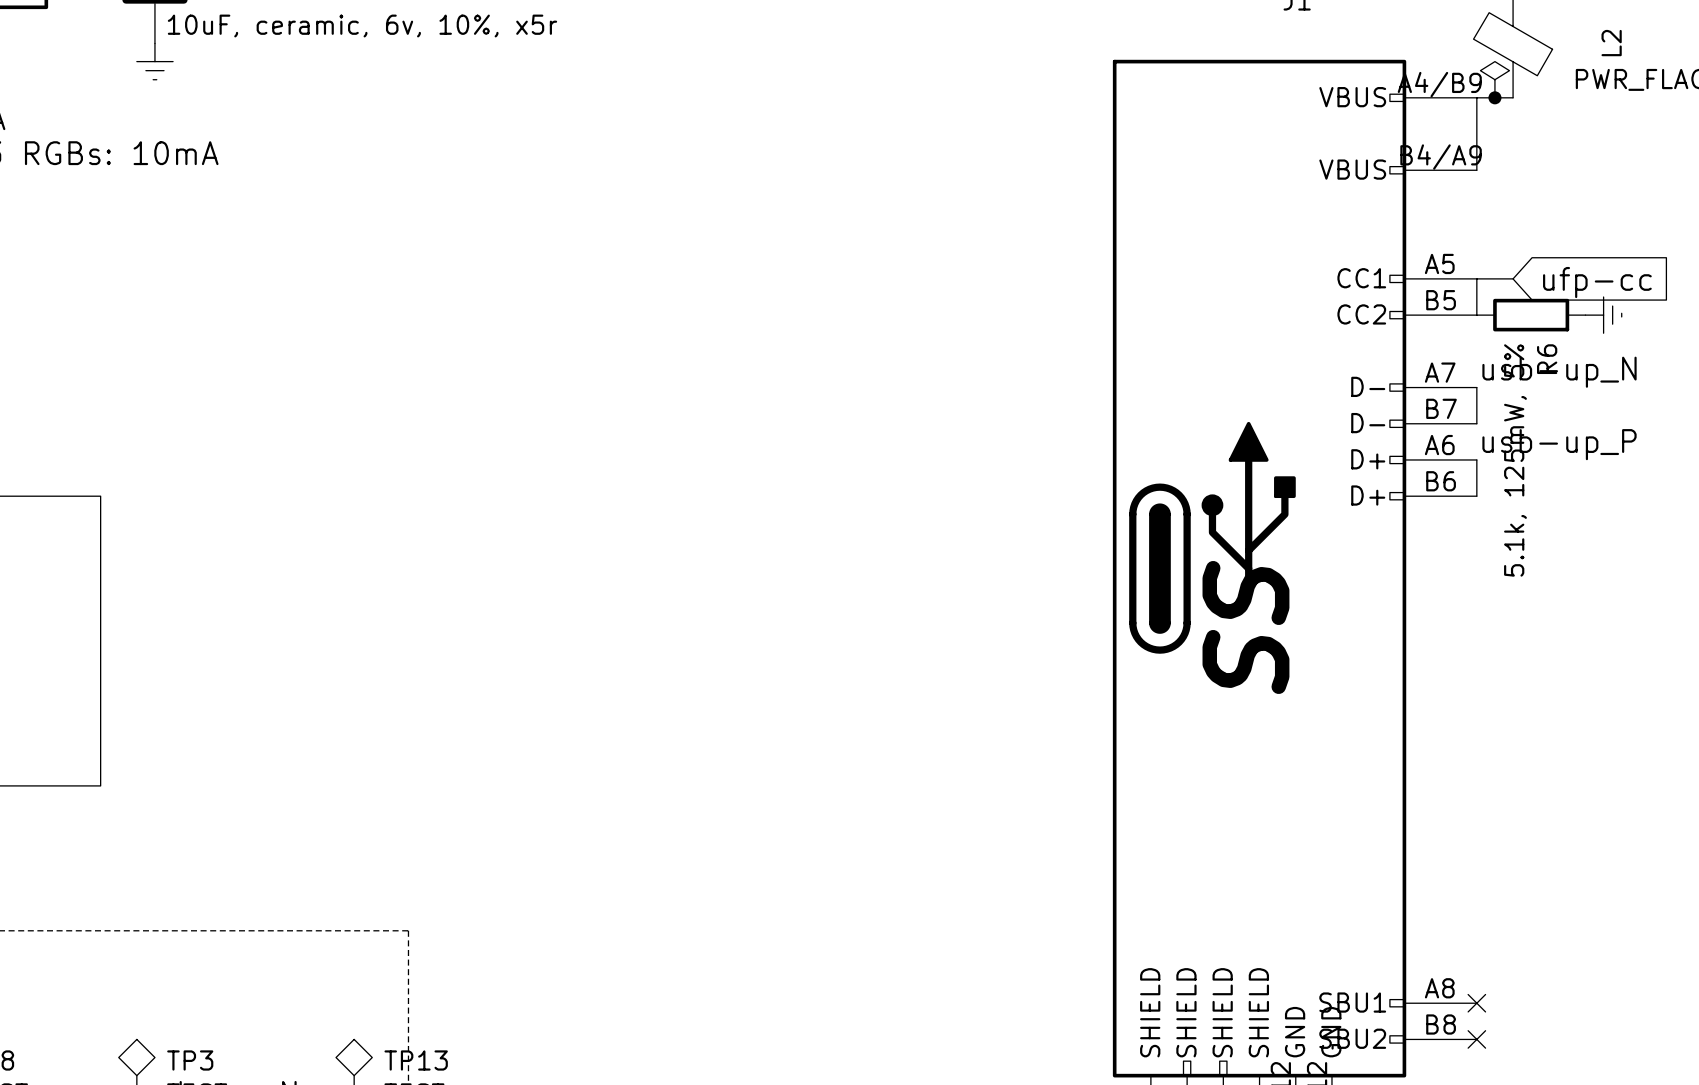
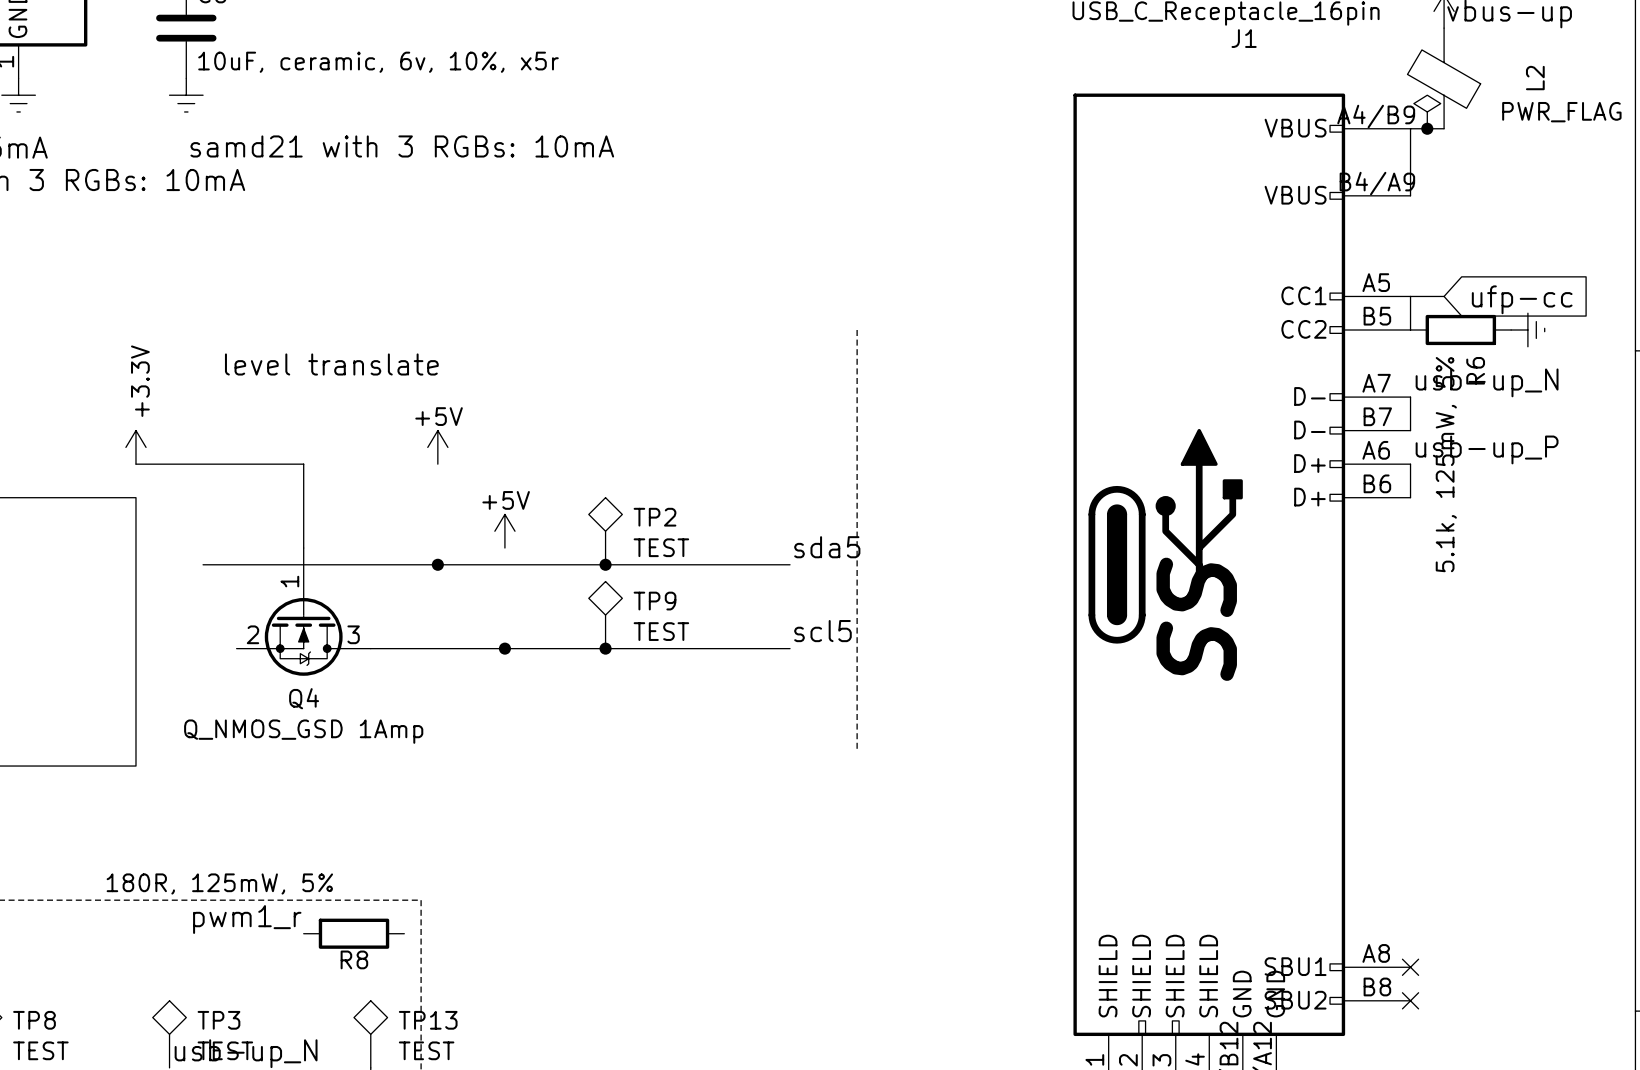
text: none -> samd21 with 3 RGBs: 10mA (402, 146)
line: none -> (857, 330) (857, 749)
text: none -> level translate (331, 364)
power symbol: none -> +3.3V (135, 447)
power symbol: none -> +5V (437, 447)
wire: none -> (135, 464) (303, 464) (303, 548)
power symbol: none -> +5V (504, 531)
TP2: none -> TEST (605, 531)
label: none -> sda5 (827, 547)
wire: none -> (203, 564) (790, 564)
junction: none -> (437, 564)
junction: none -> (605, 564)
Q4: none -> Q_NMOS_GSD 1Amp (303, 611)
TP9: none -> TEST (605, 615)
label: none -> scl5 (822, 631)
wire: none -> (370, 648) (790, 648)
junction: none -> (504, 648)
junction: none -> (605, 648)
label: none -> pwm1_r (247, 919)
R8: none -> 180R, 125mW, 5% (354, 933)

